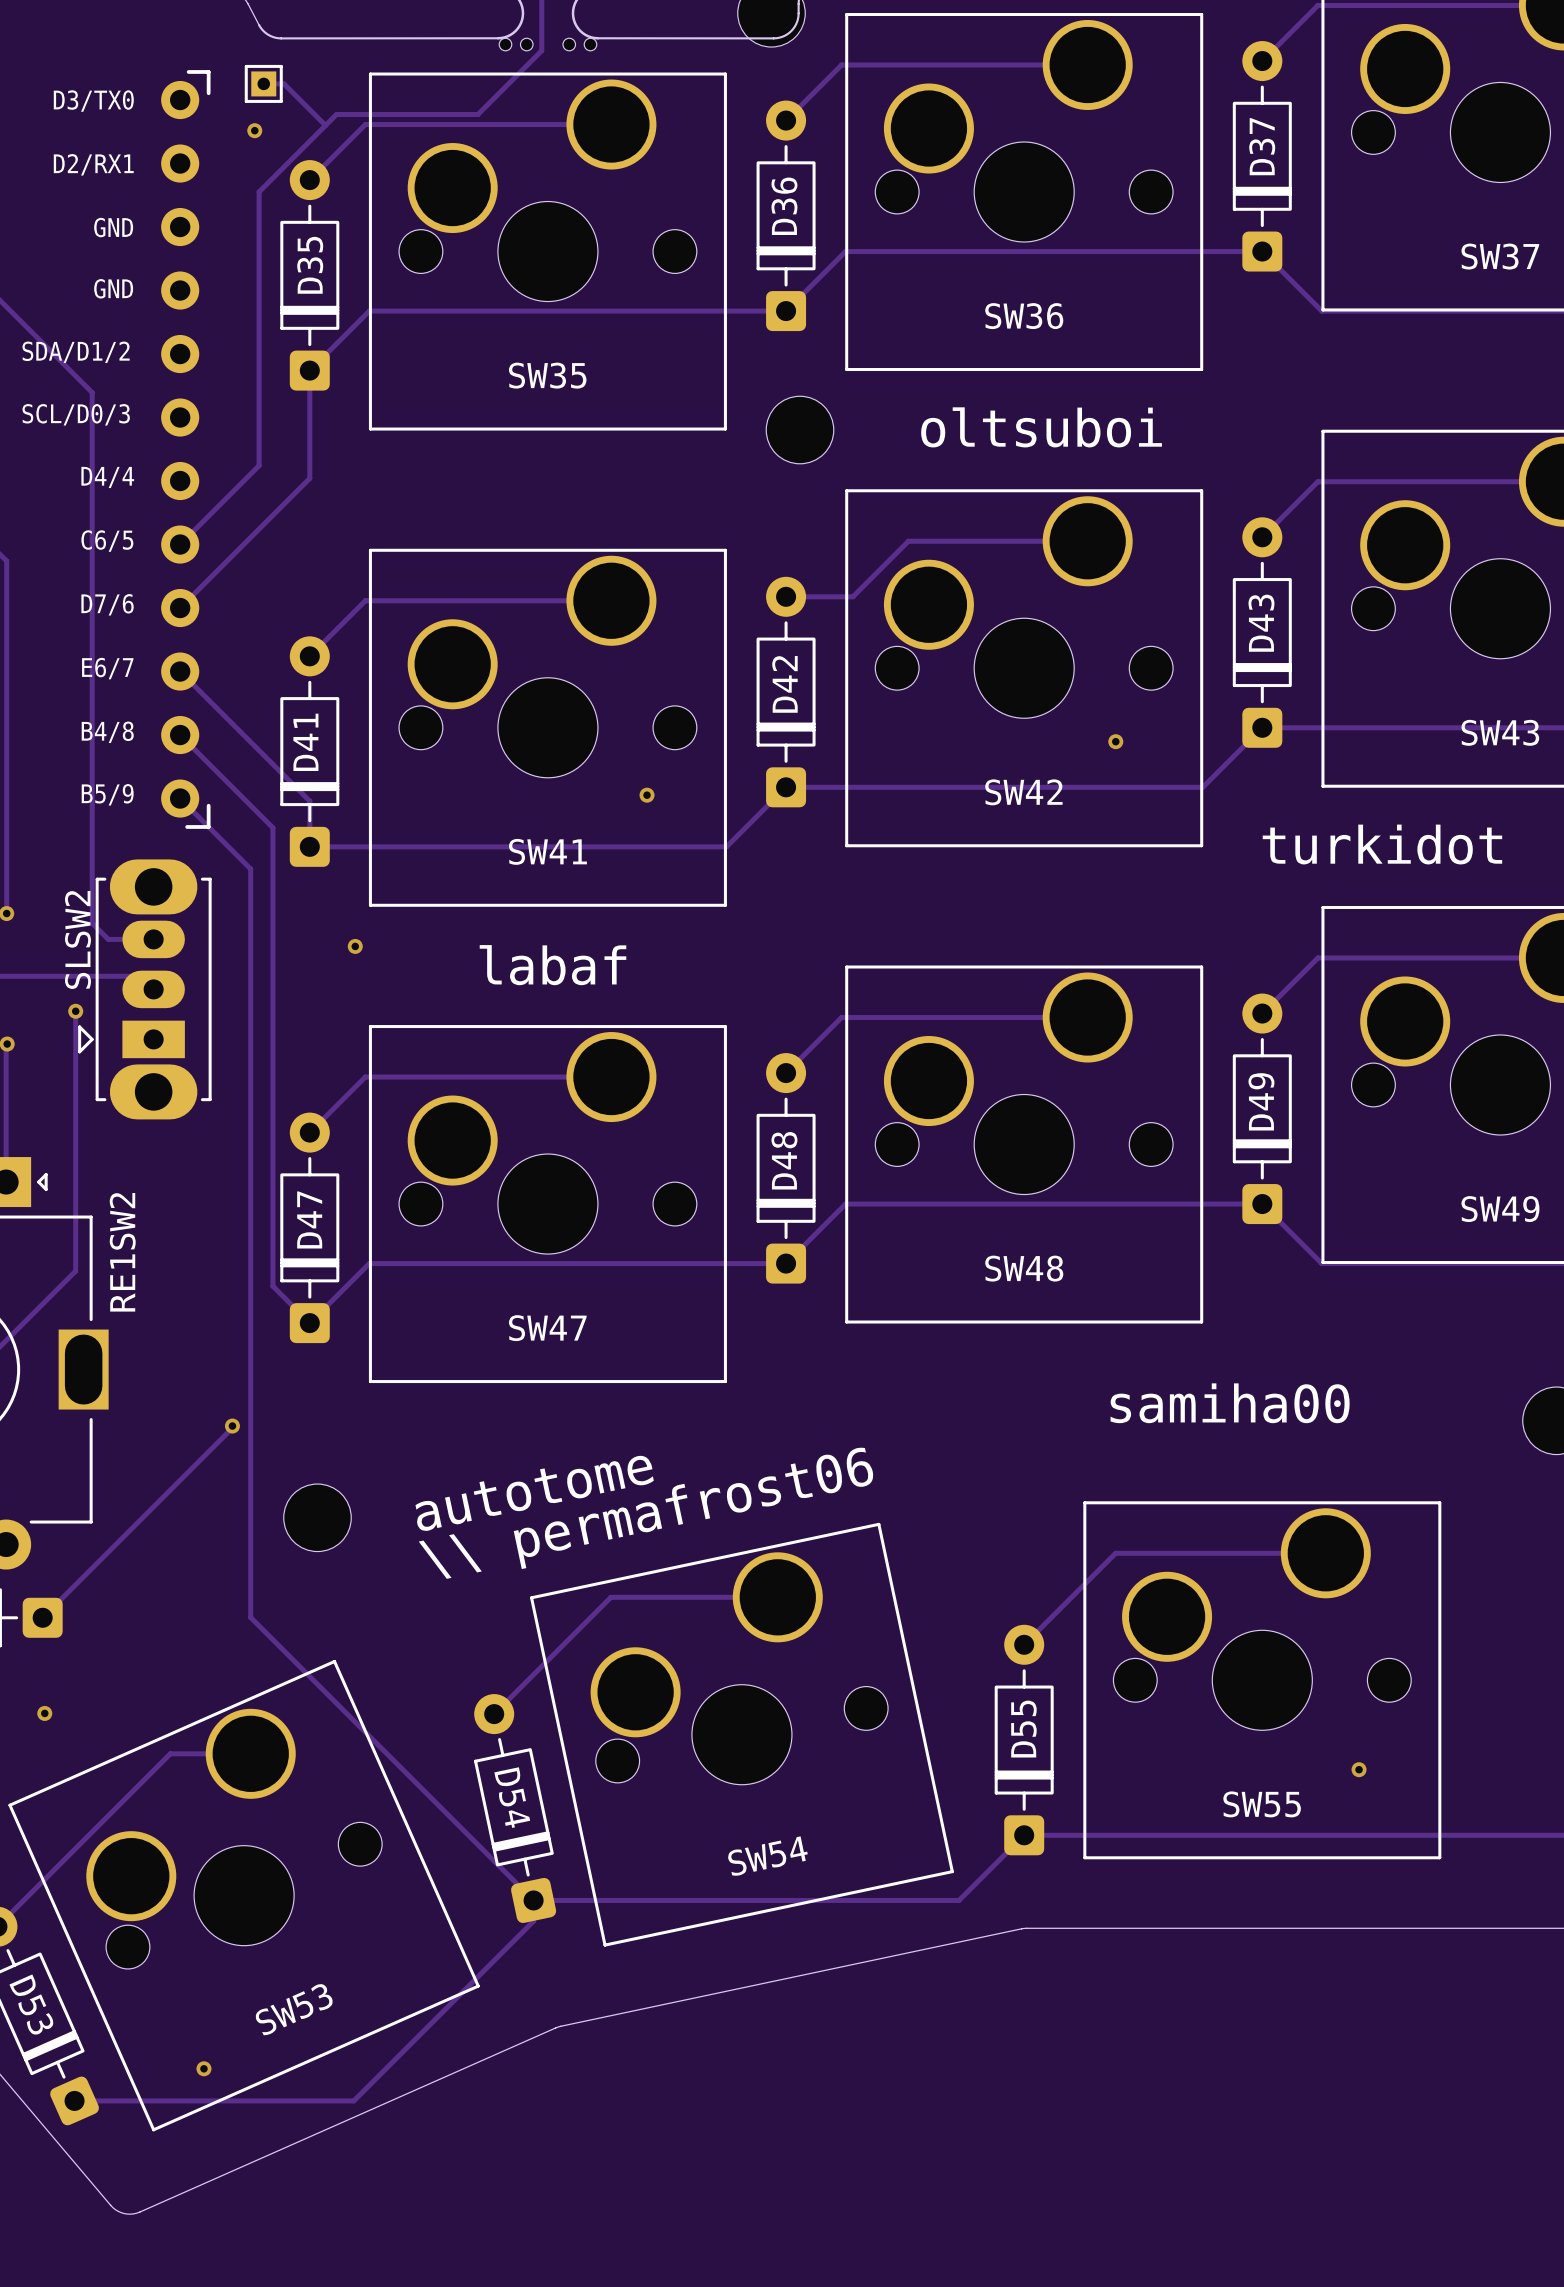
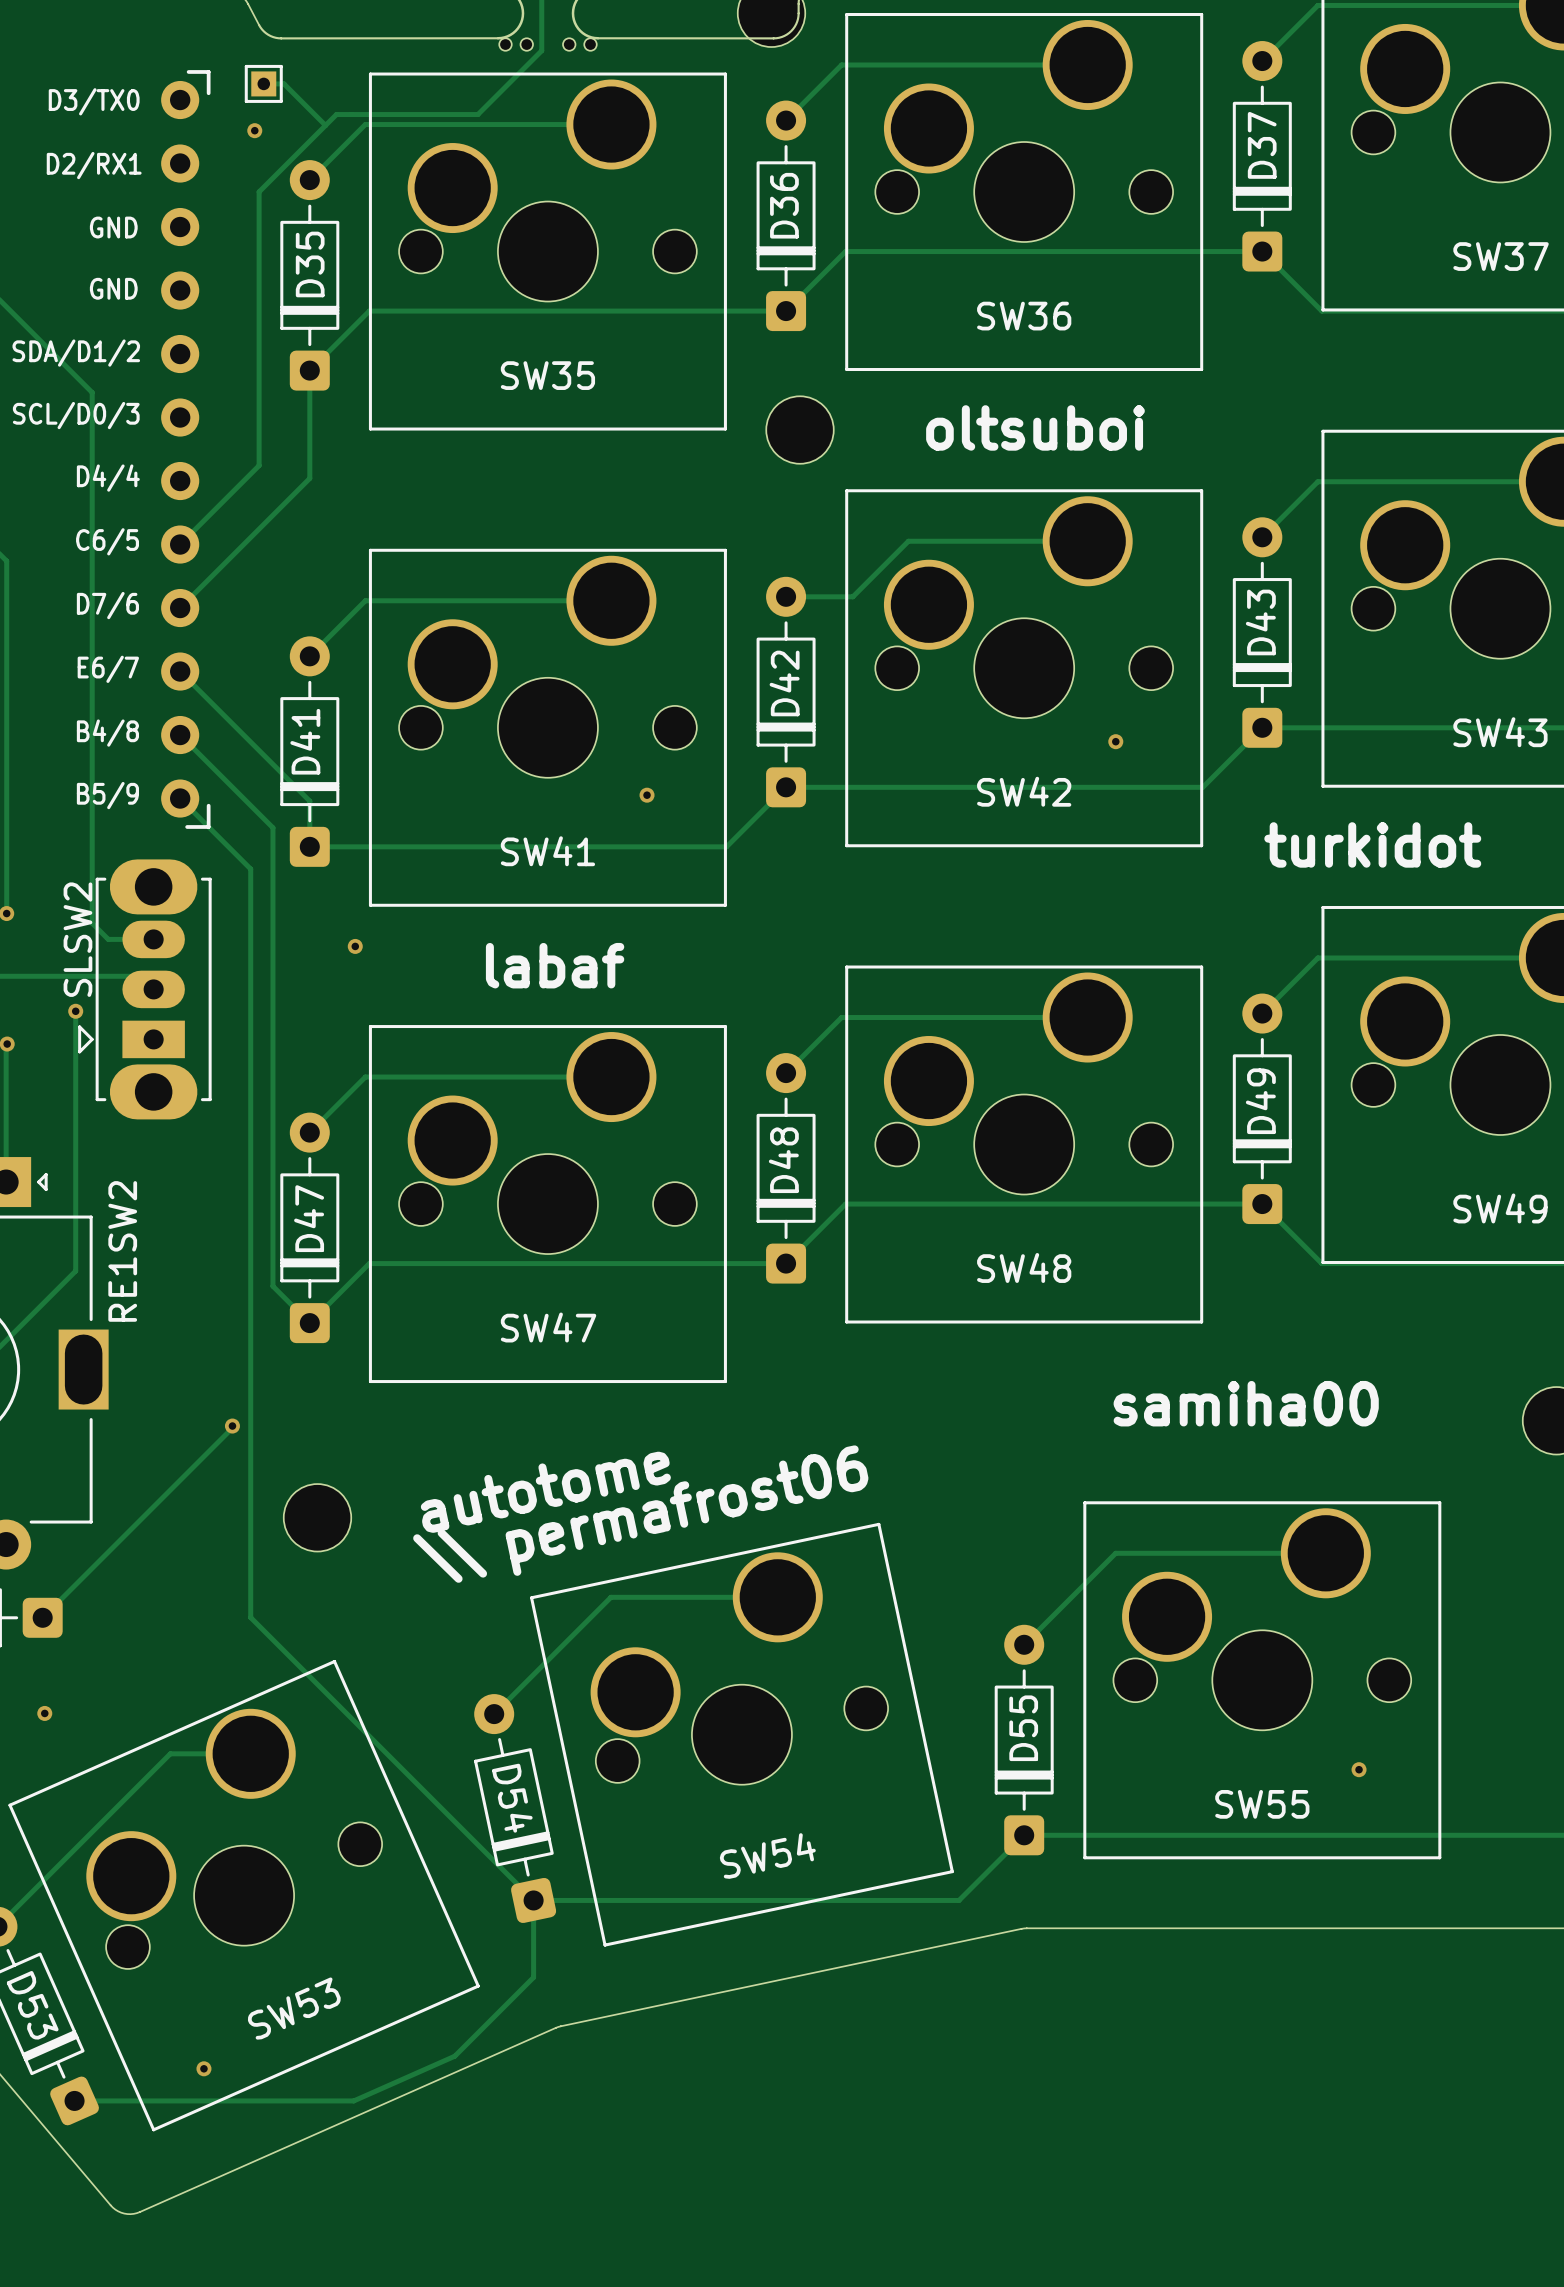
track: (533, 1921) (353, 2100) -> (533, 1921) (533, 1977) (454, 2056) (353, 2100)

